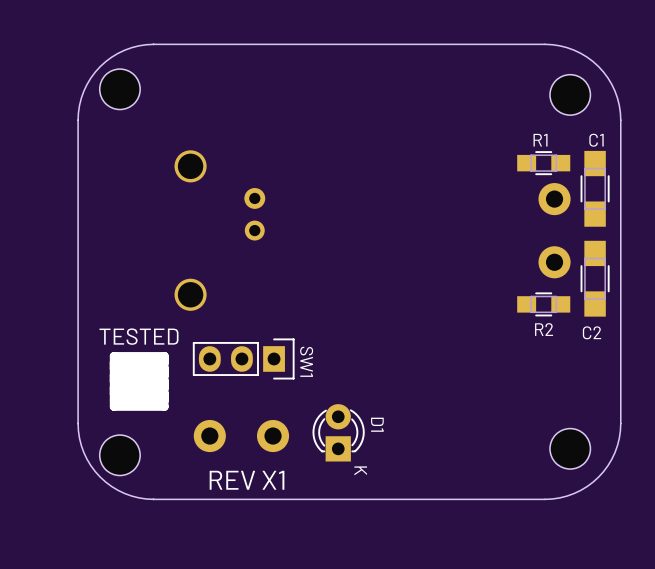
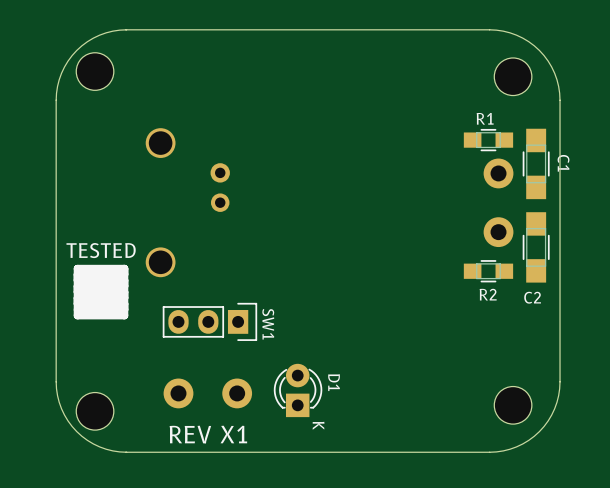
C1 name rotation: 0° (596, 140) -> 90° clockwise (563, 163)
C1 name position: C1 (596, 140) -> C1 (563, 163)
TESTED position: (139, 381) -> (101, 292)

